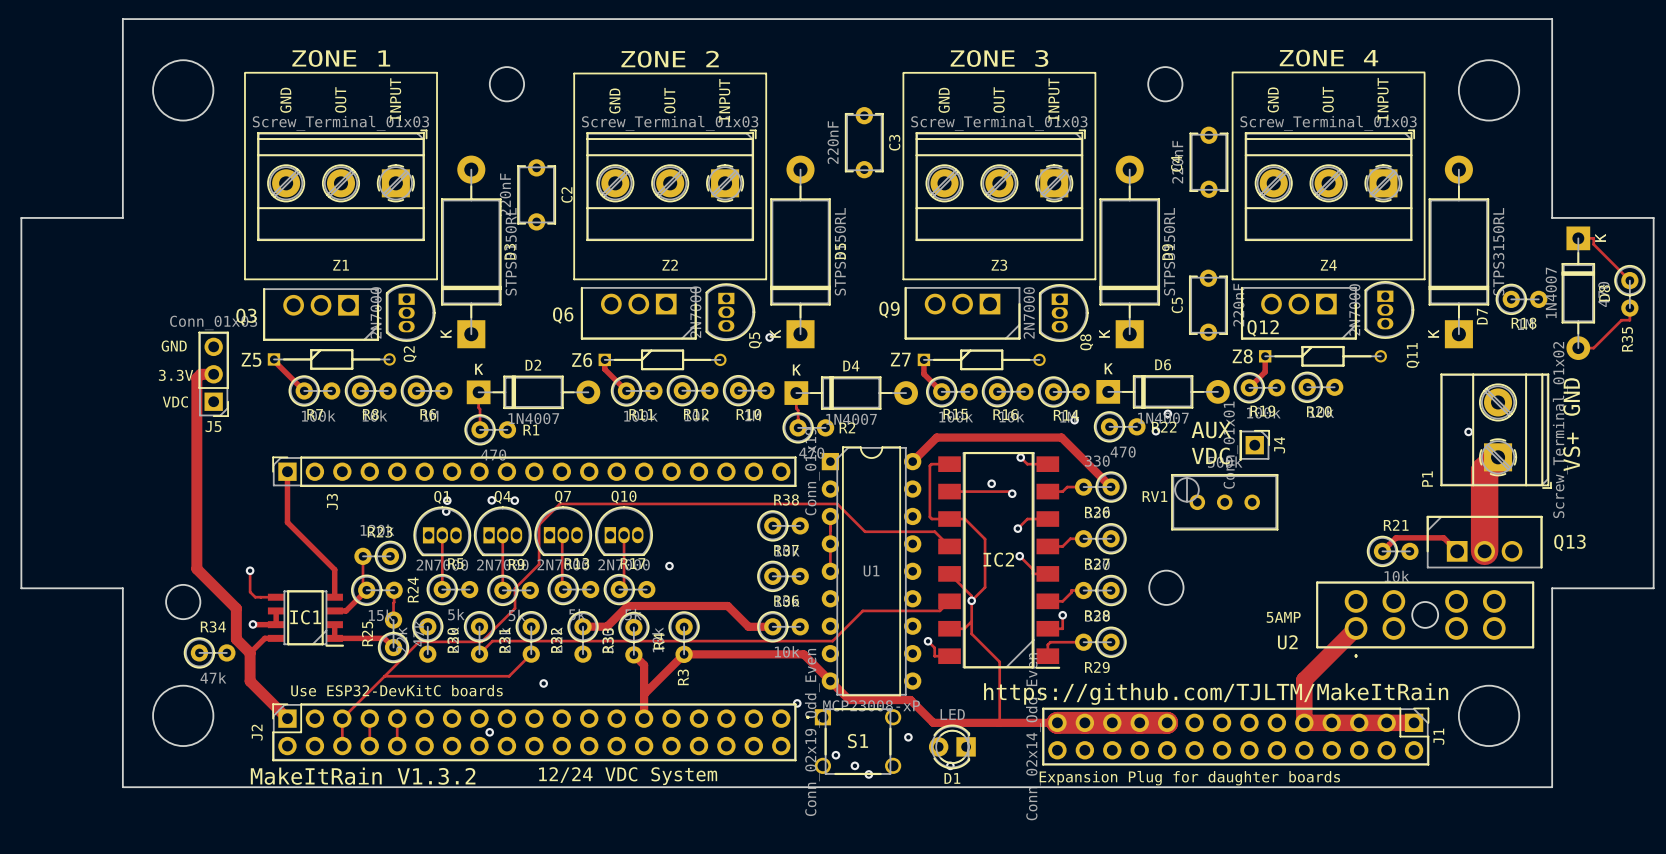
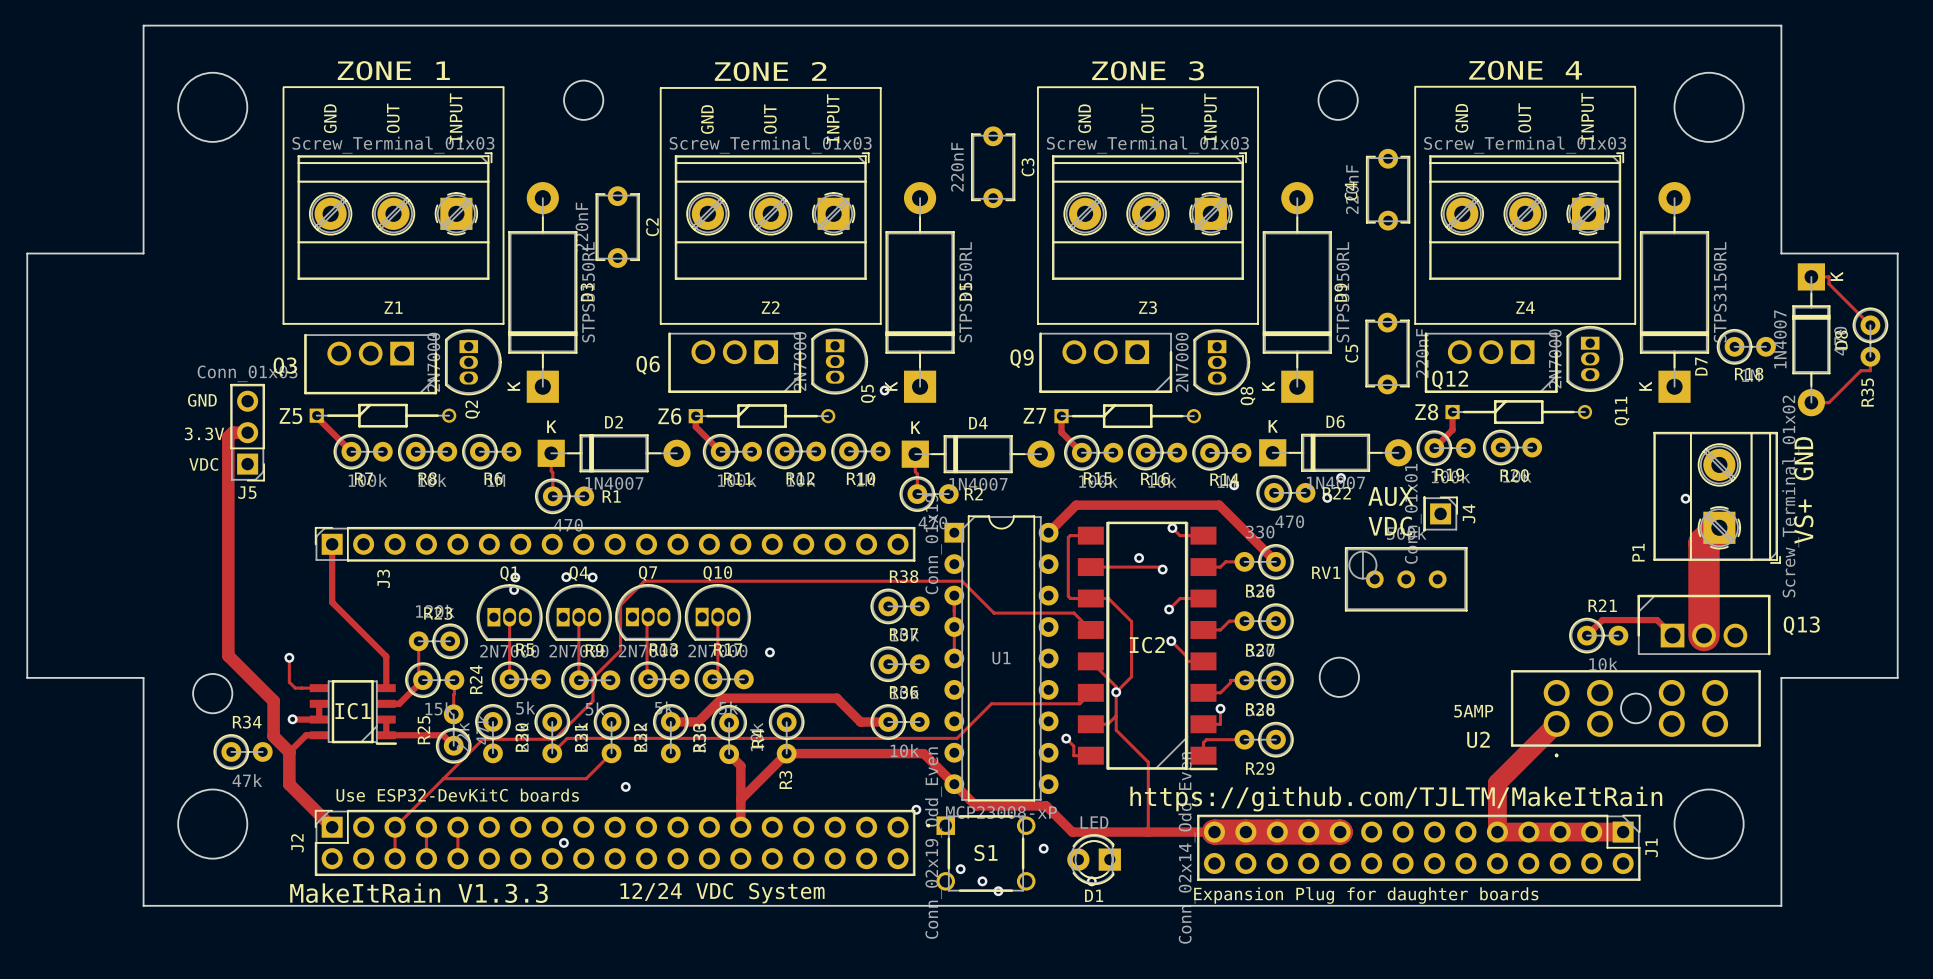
text: MakeItRain V1.3.2 (363, 776) -> MakeItRain V1.3.3 (419, 893)

